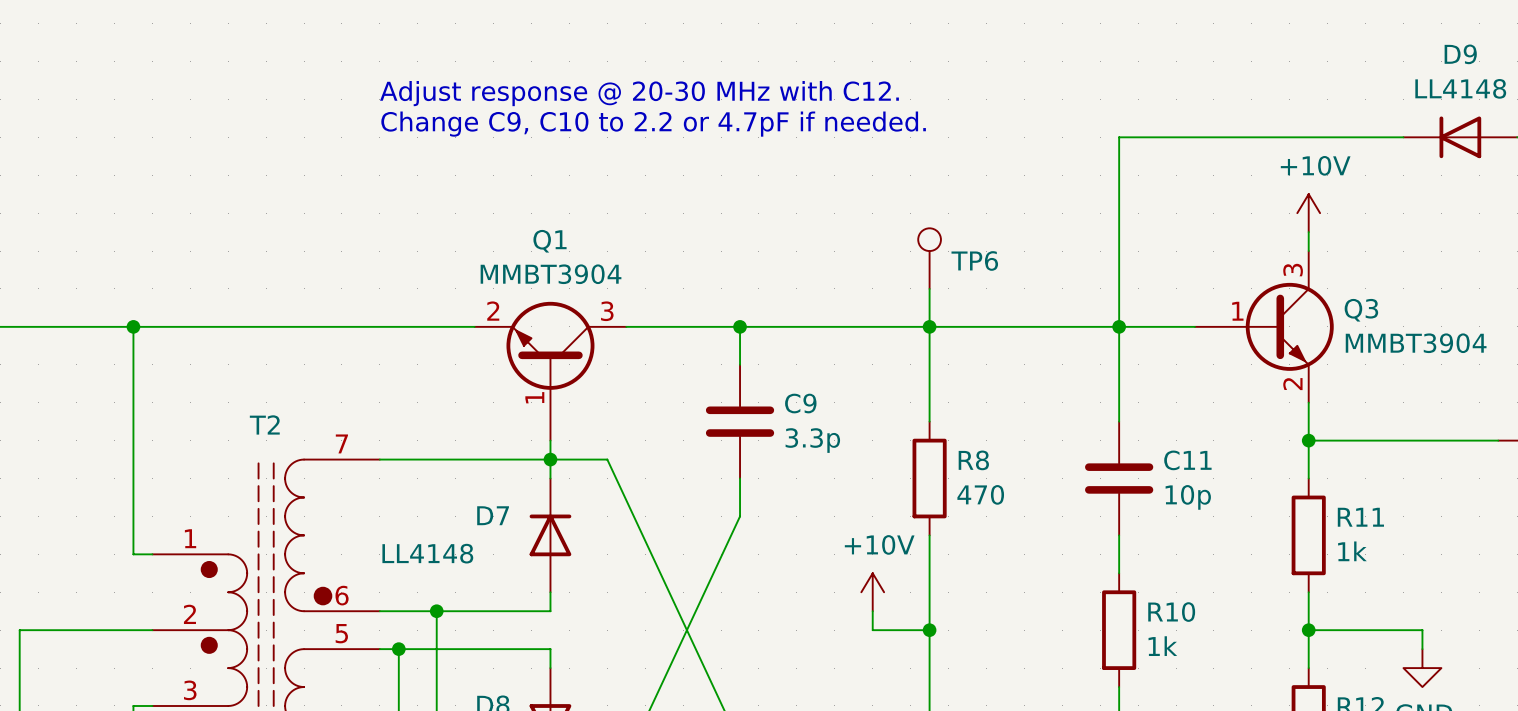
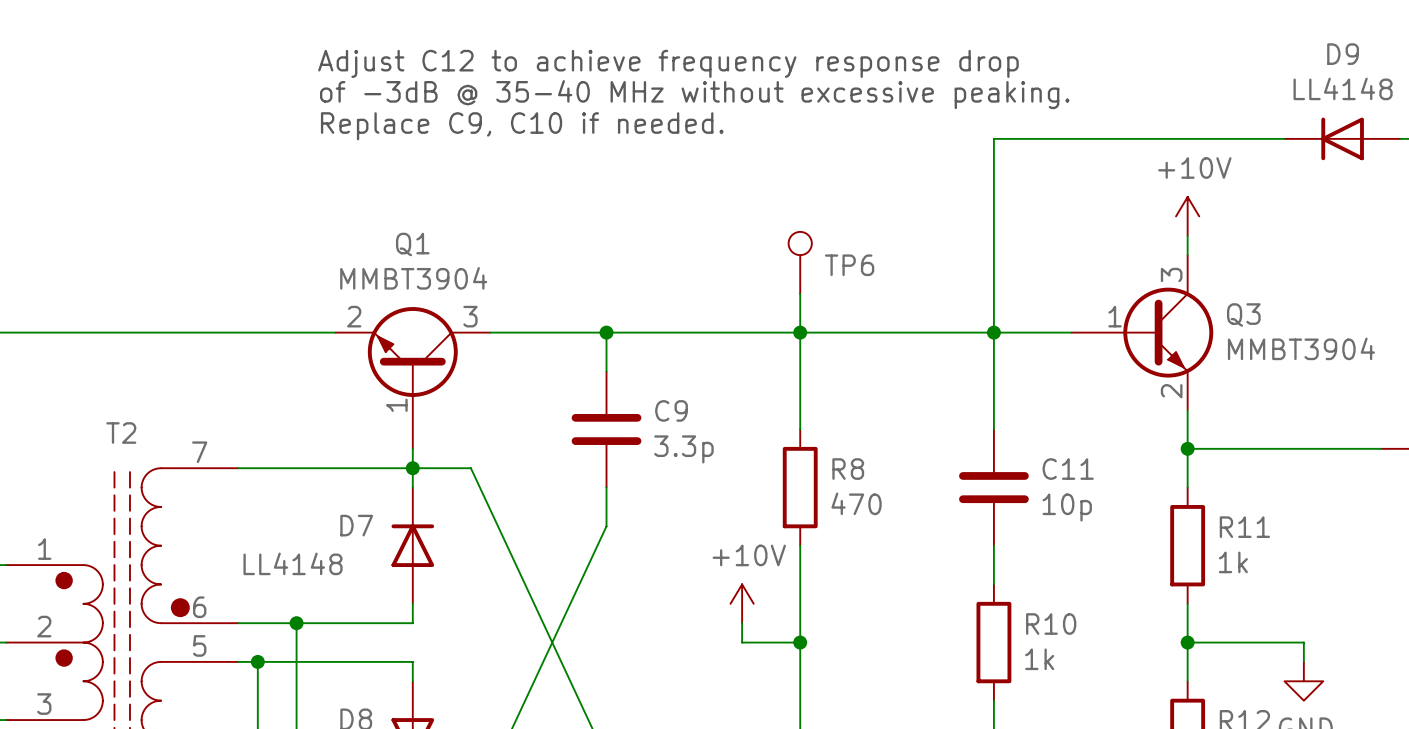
text: none -> Adjust C12 to achieve frequency response drop (668, 63)
text: Adjust response @ 20-30 MHz with C12. (639, 93) -> none
text: none -> of -3dB @ 35-40 MHz without excessive peaking. (694, 94)
text: Change C9, C10 to 2.2 or 4.7pF if needed. (653, 124) -> Replace C9, C10 if needed. (522, 126)

